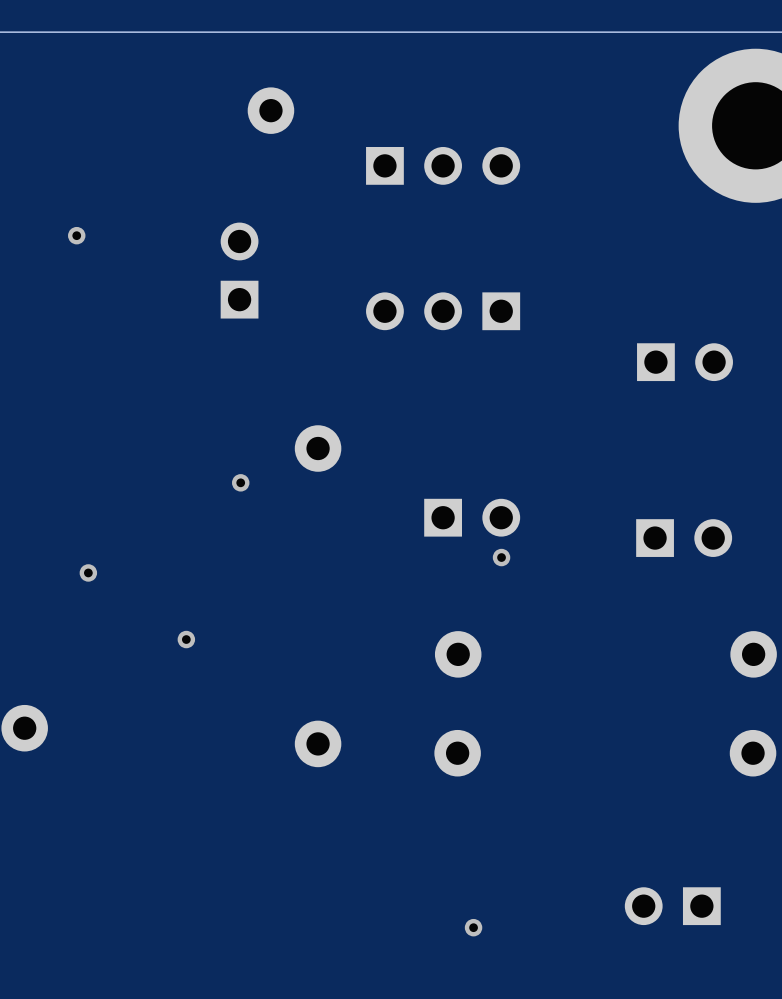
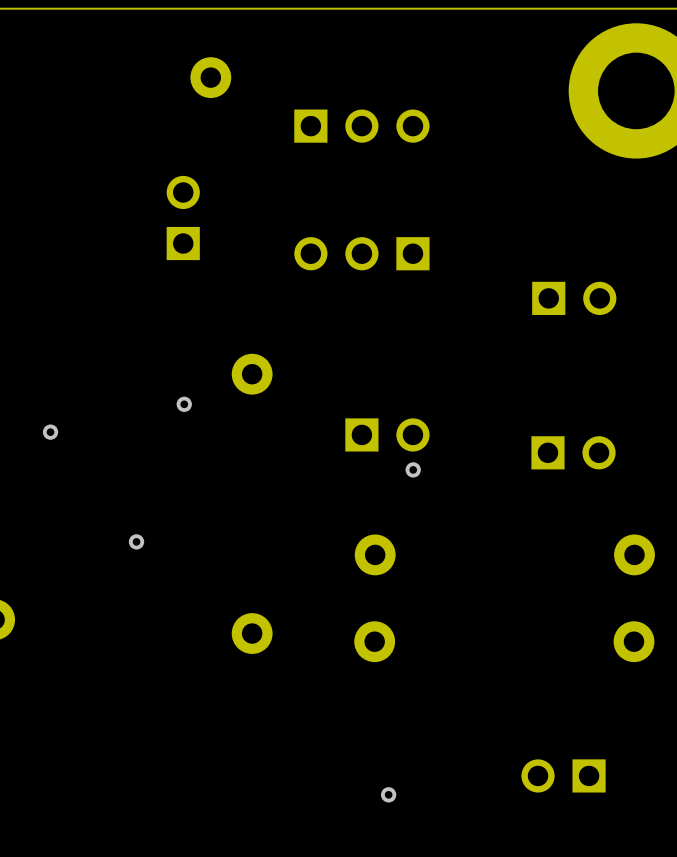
via: (76, 235) -> none
via position: (88, 572) -> (50, 432)

